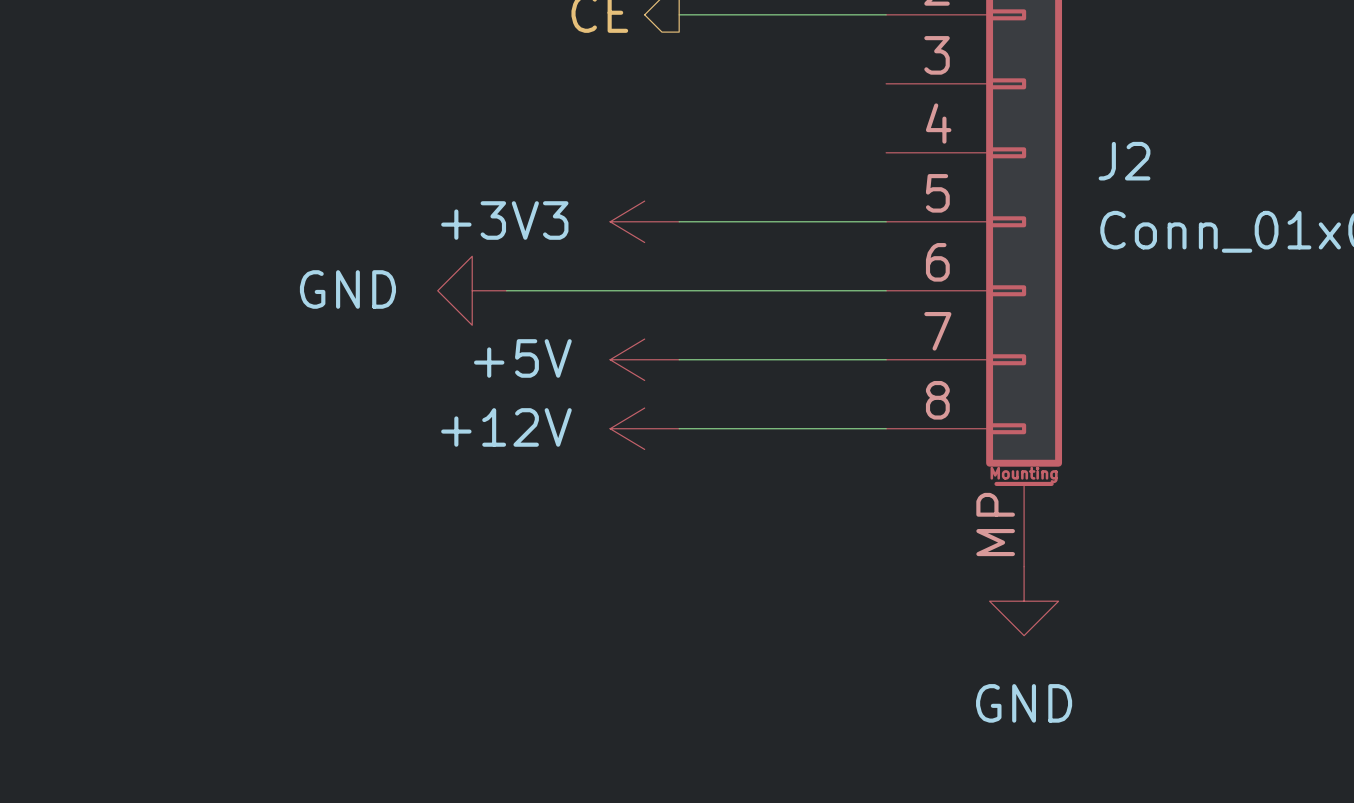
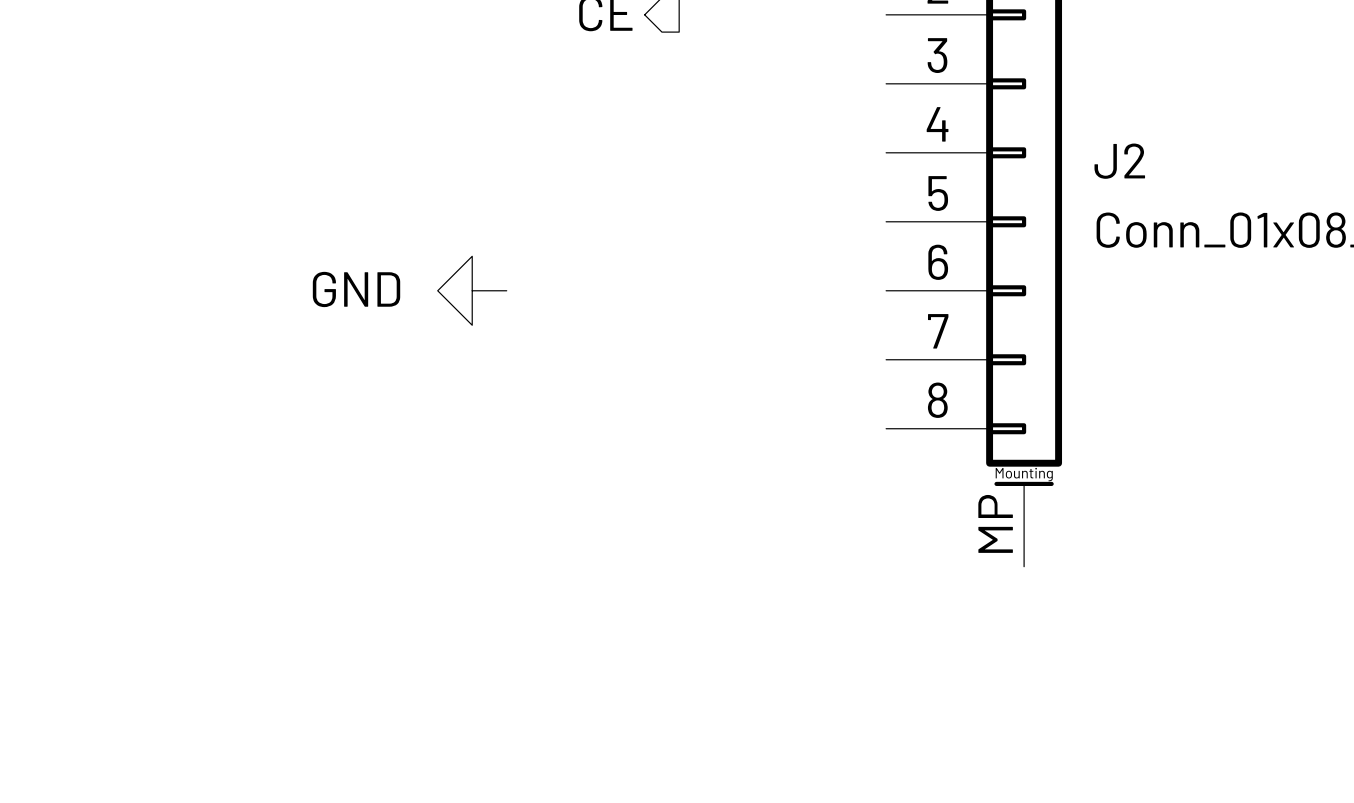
wire: (679, 14) (886, 14) -> none
power symbol: +3V3 (644, 221) -> none
wire: (679, 221) (886, 221) -> none
wire: (506, 290) (886, 290) -> none
power symbol: +5V (644, 359) -> none
wire: (679, 359) (886, 359) -> none
power symbol: +12V (644, 428) -> none
wire: (679, 428) (886, 428) -> none
power symbol: GND (1024, 601) -> none

